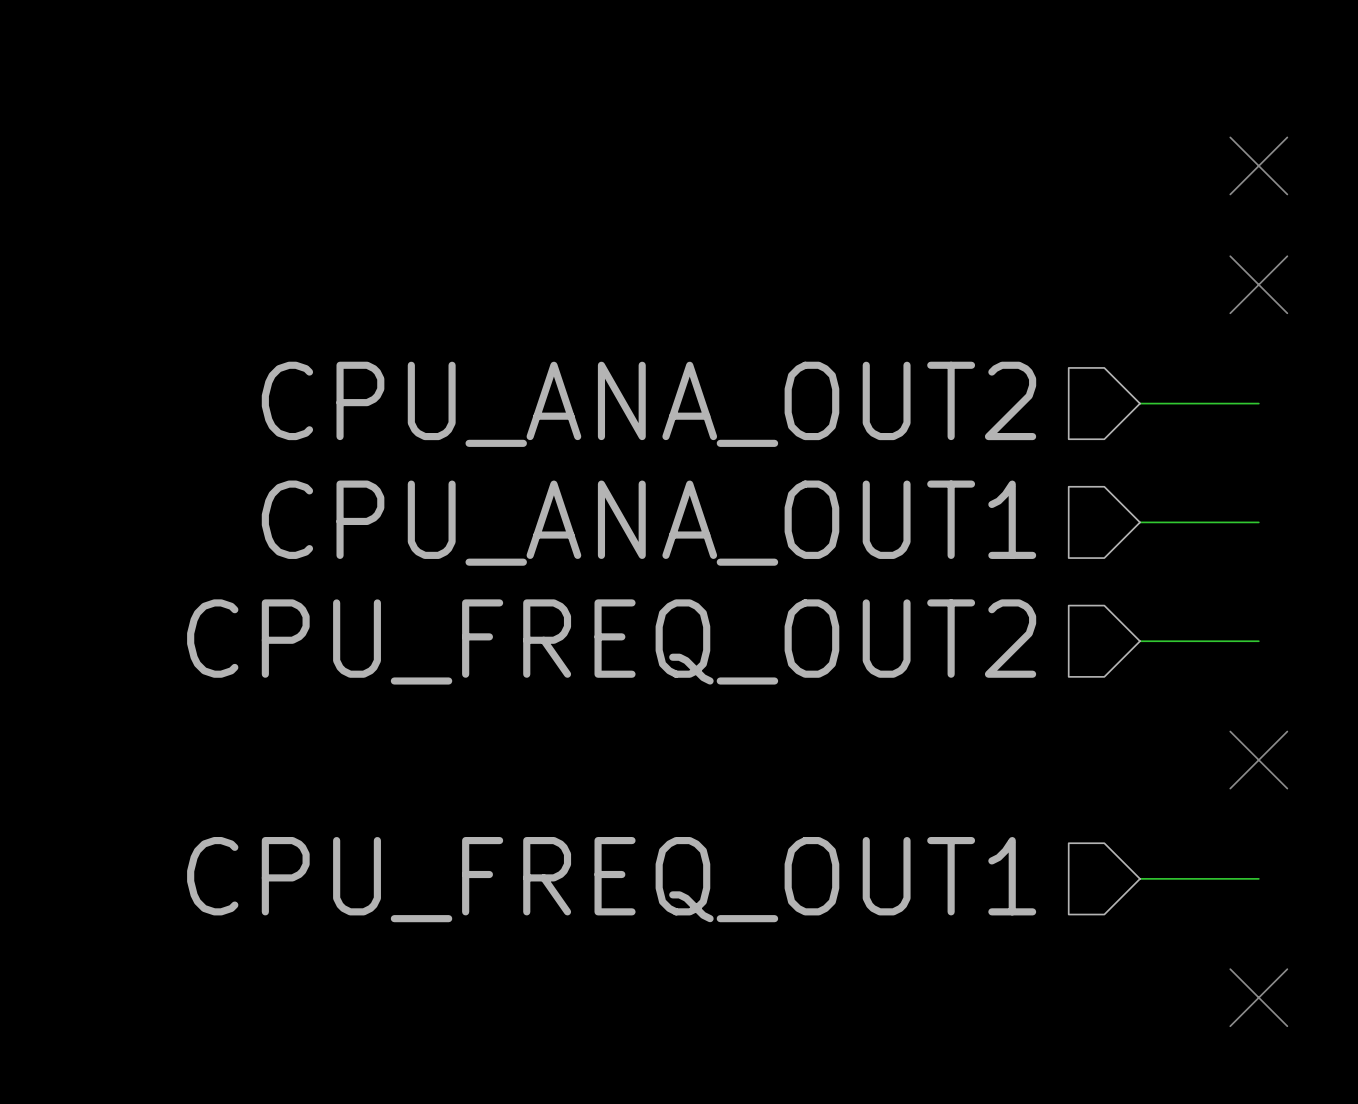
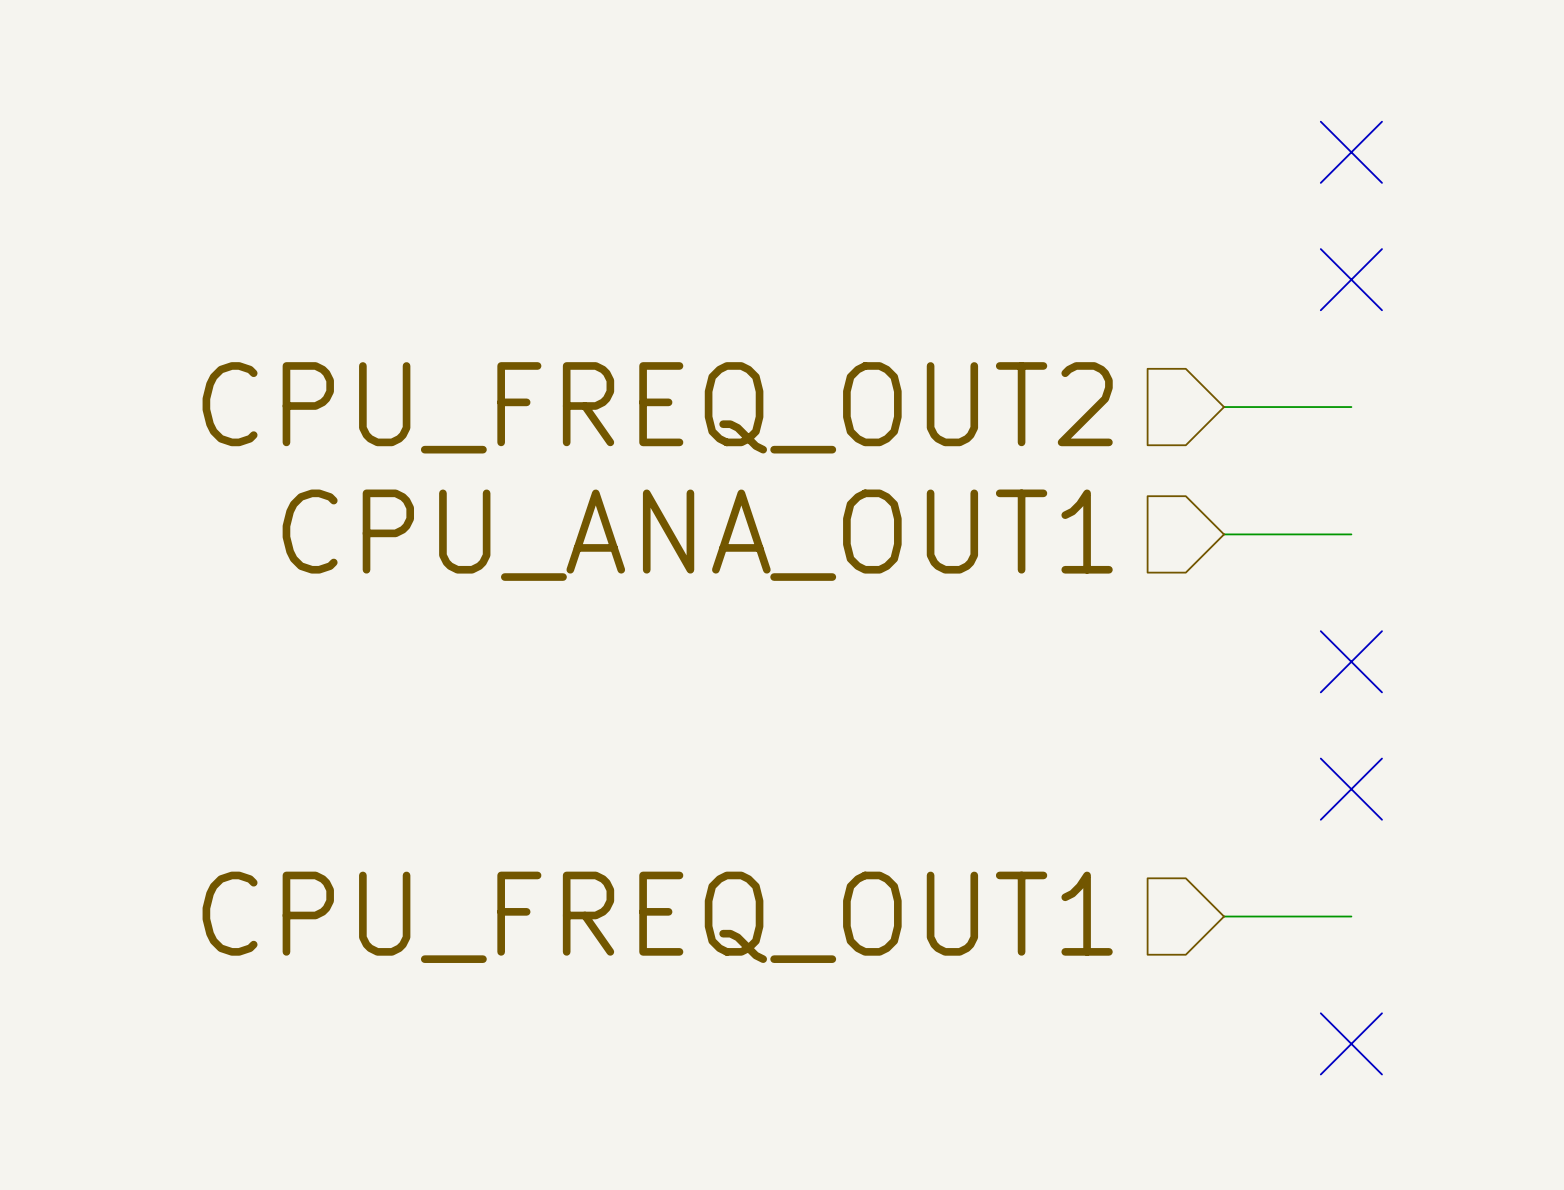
hierarchical label: CPU_ANA_OUT2 (648, 404) -> CPU_FREQ_OUT2 (657, 407)
hierarchical label: CPU_FREQ_OUT2 (611, 641) -> none
wire: (1140, 641) (1258, 641) -> none
no-connect mark: none -> (1351, 661)

